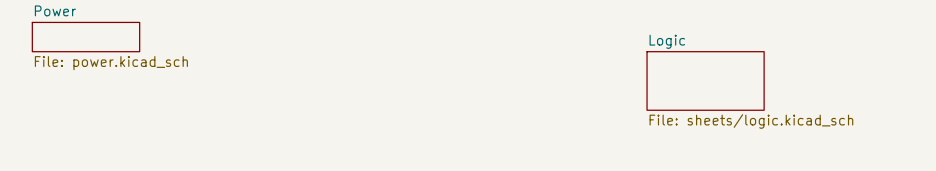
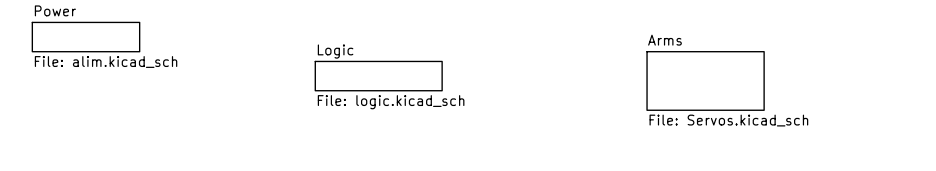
sheet Logic name: Logic (667, 41) -> Arms (664, 40)
sheet Power value: File: power.kicad_sch (111, 63) -> File: alim.kicad_sch (106, 62)
sheet Logic: none -> File: logic.kicad_sch (378, 76)
sheet Logic value: File: sheets/logic.kicad_sch (751, 121) -> File: Servos.kicad_sch (728, 120)

